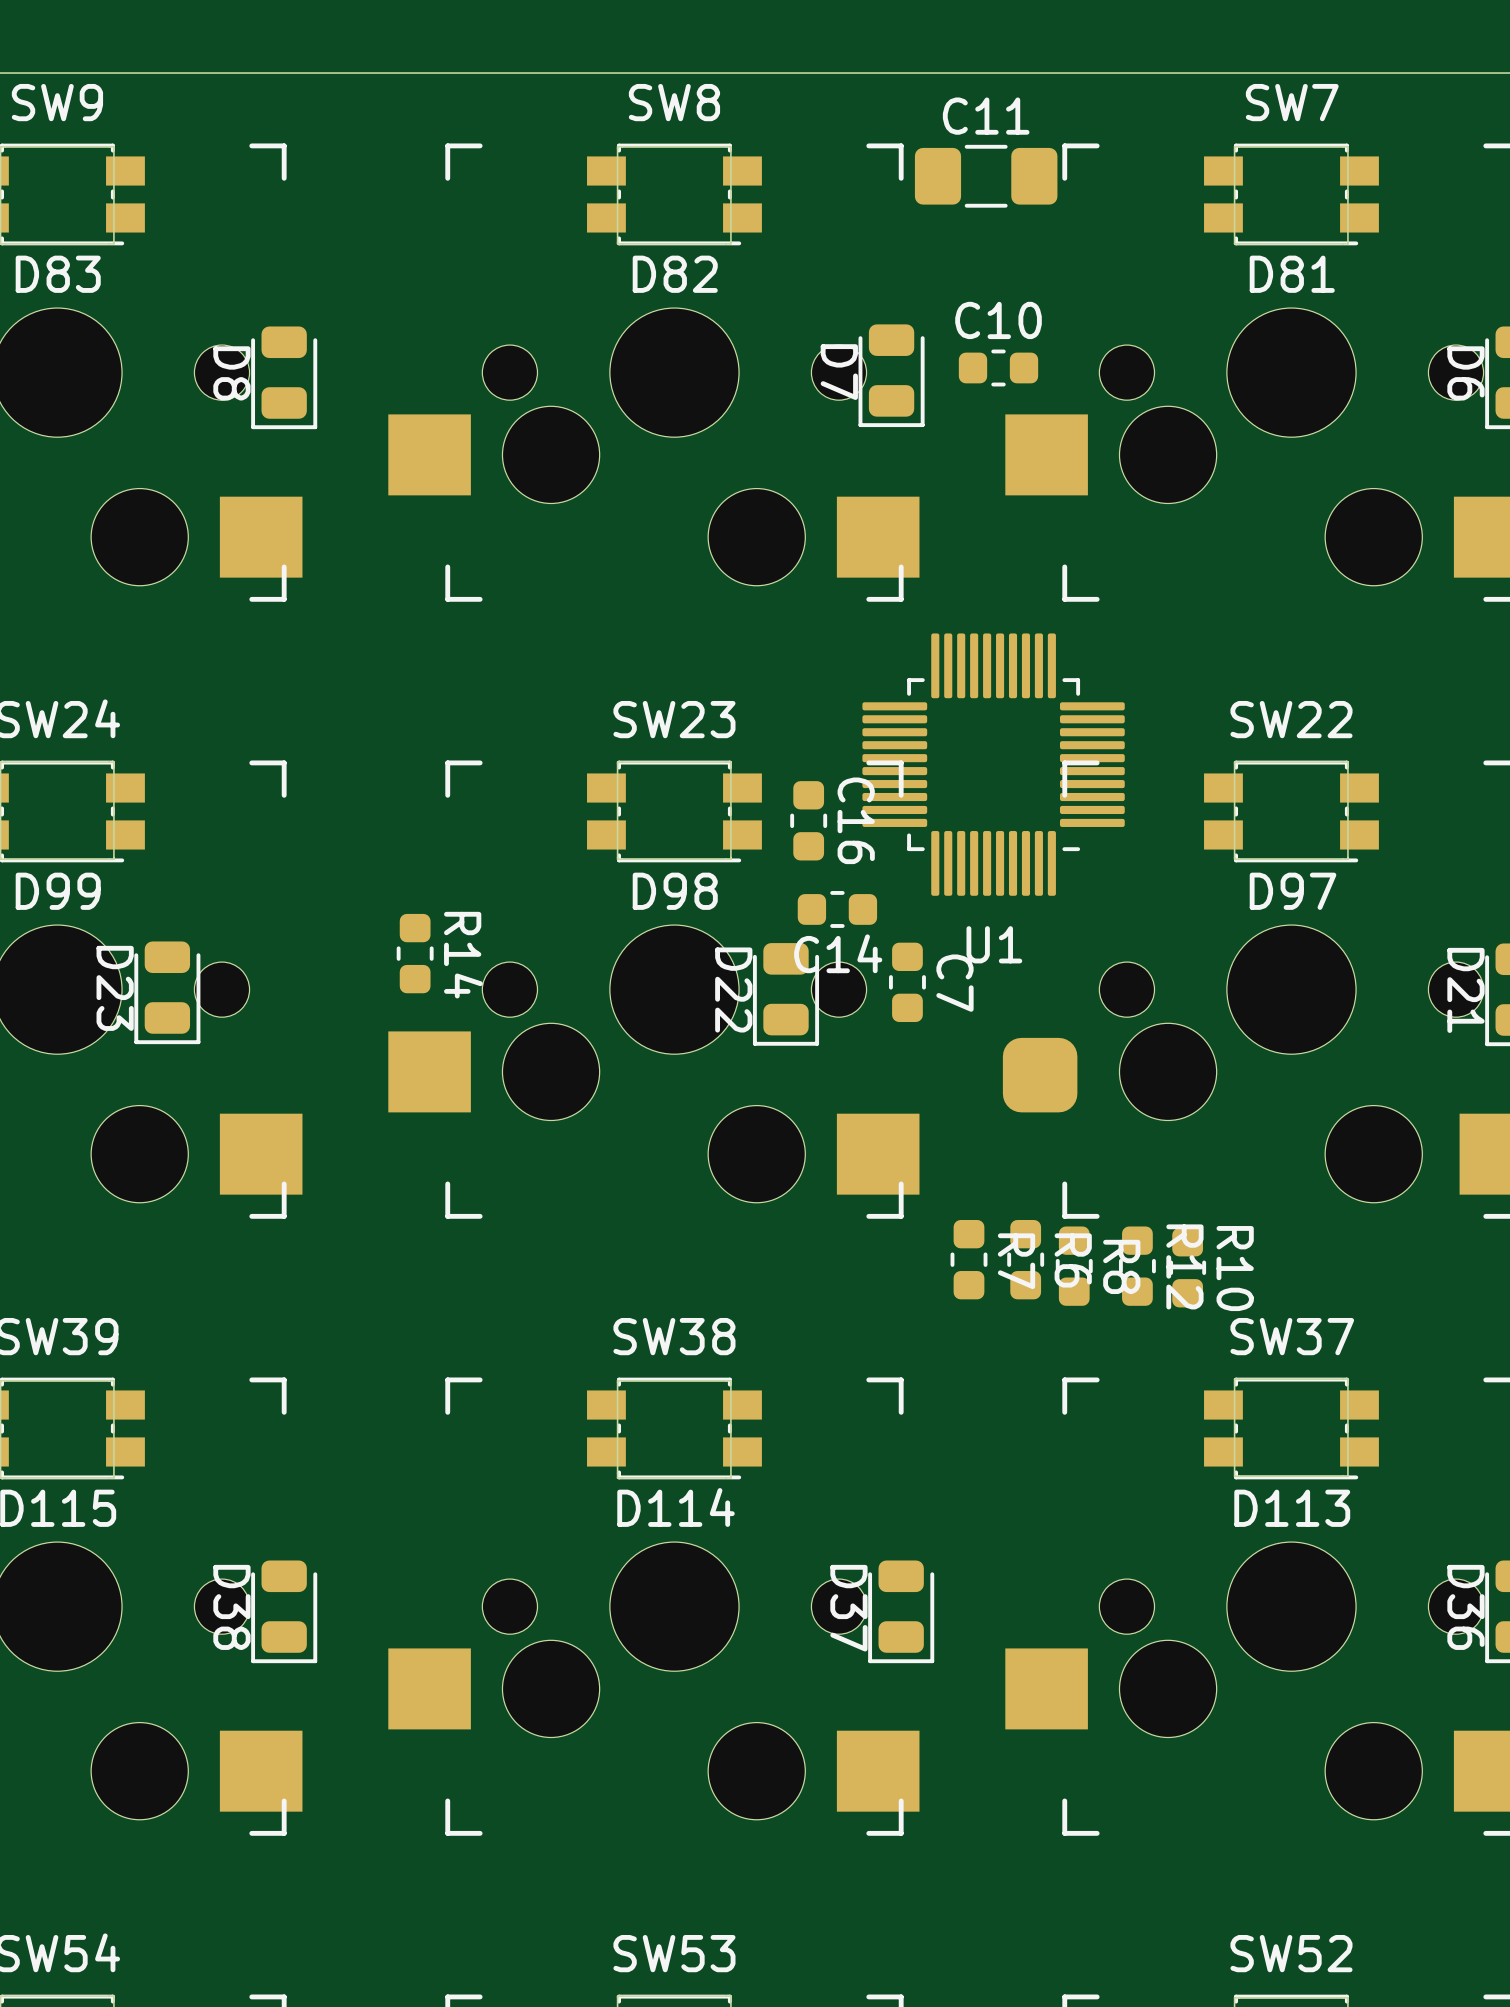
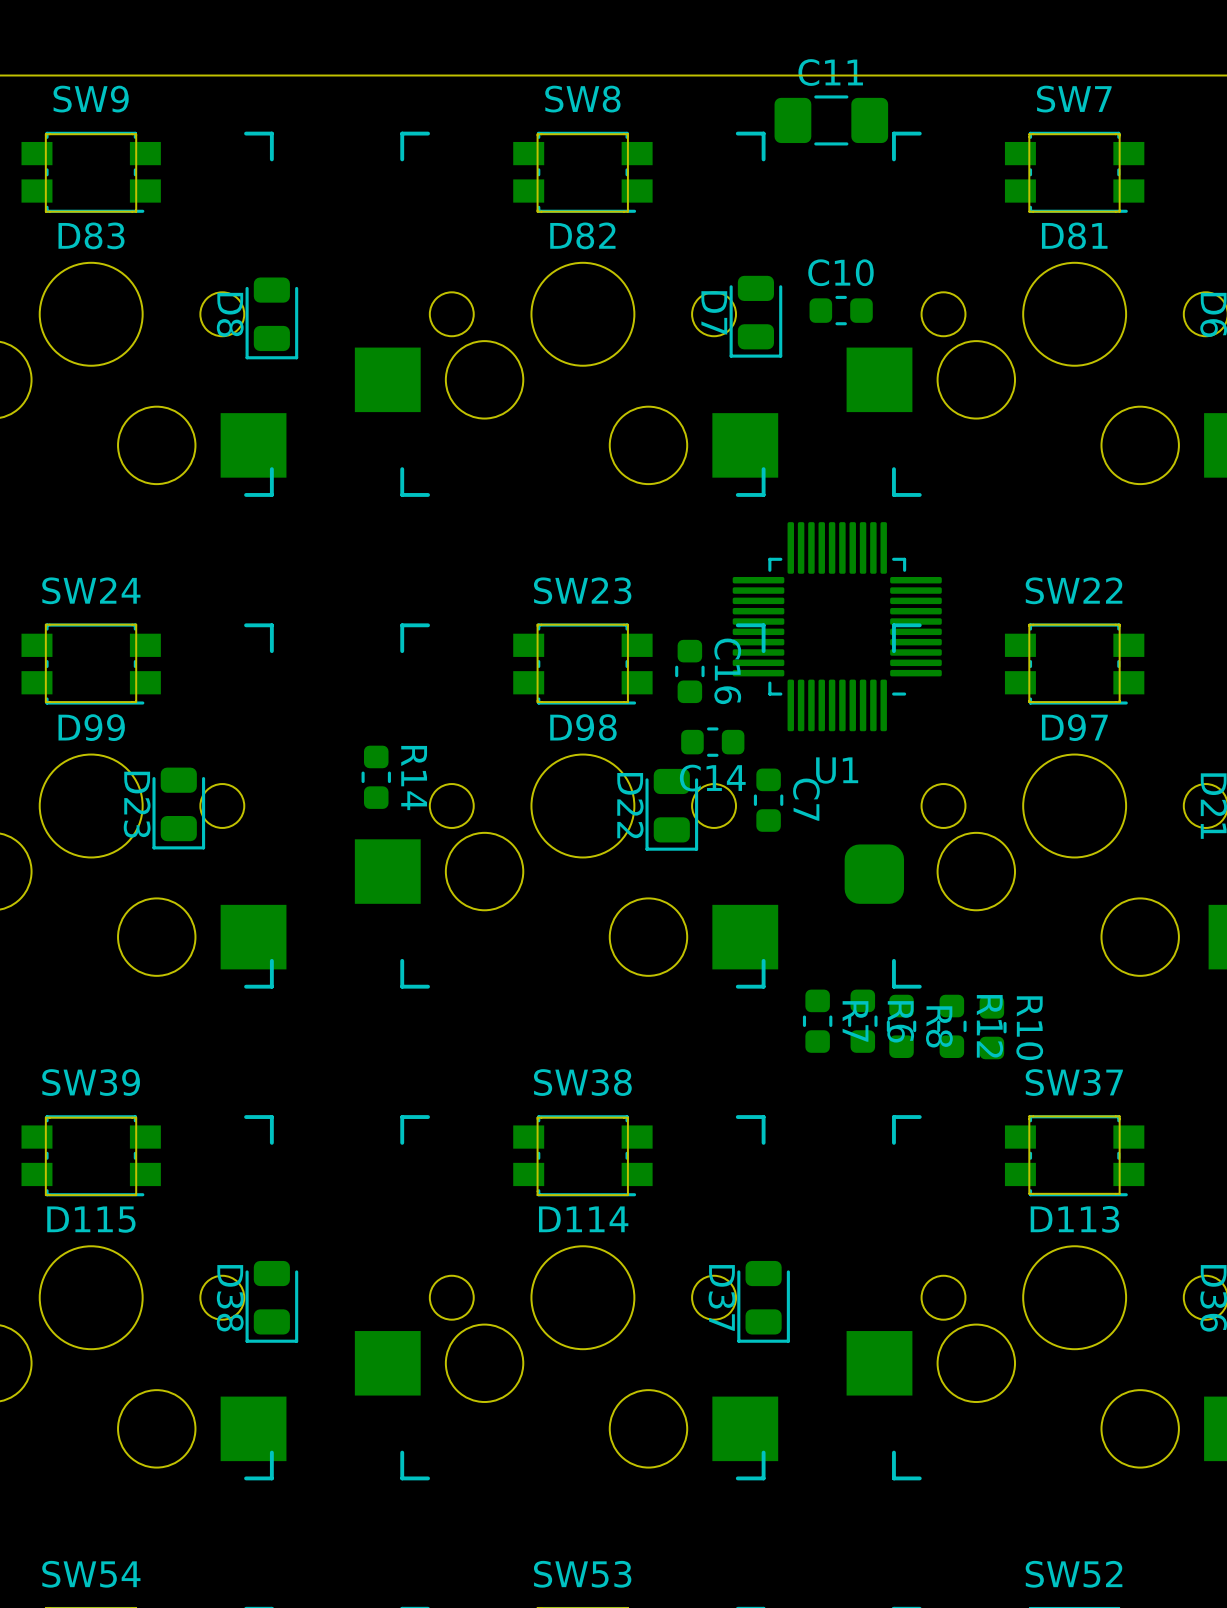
C11 position: (986, 176) -> (831, 120)

